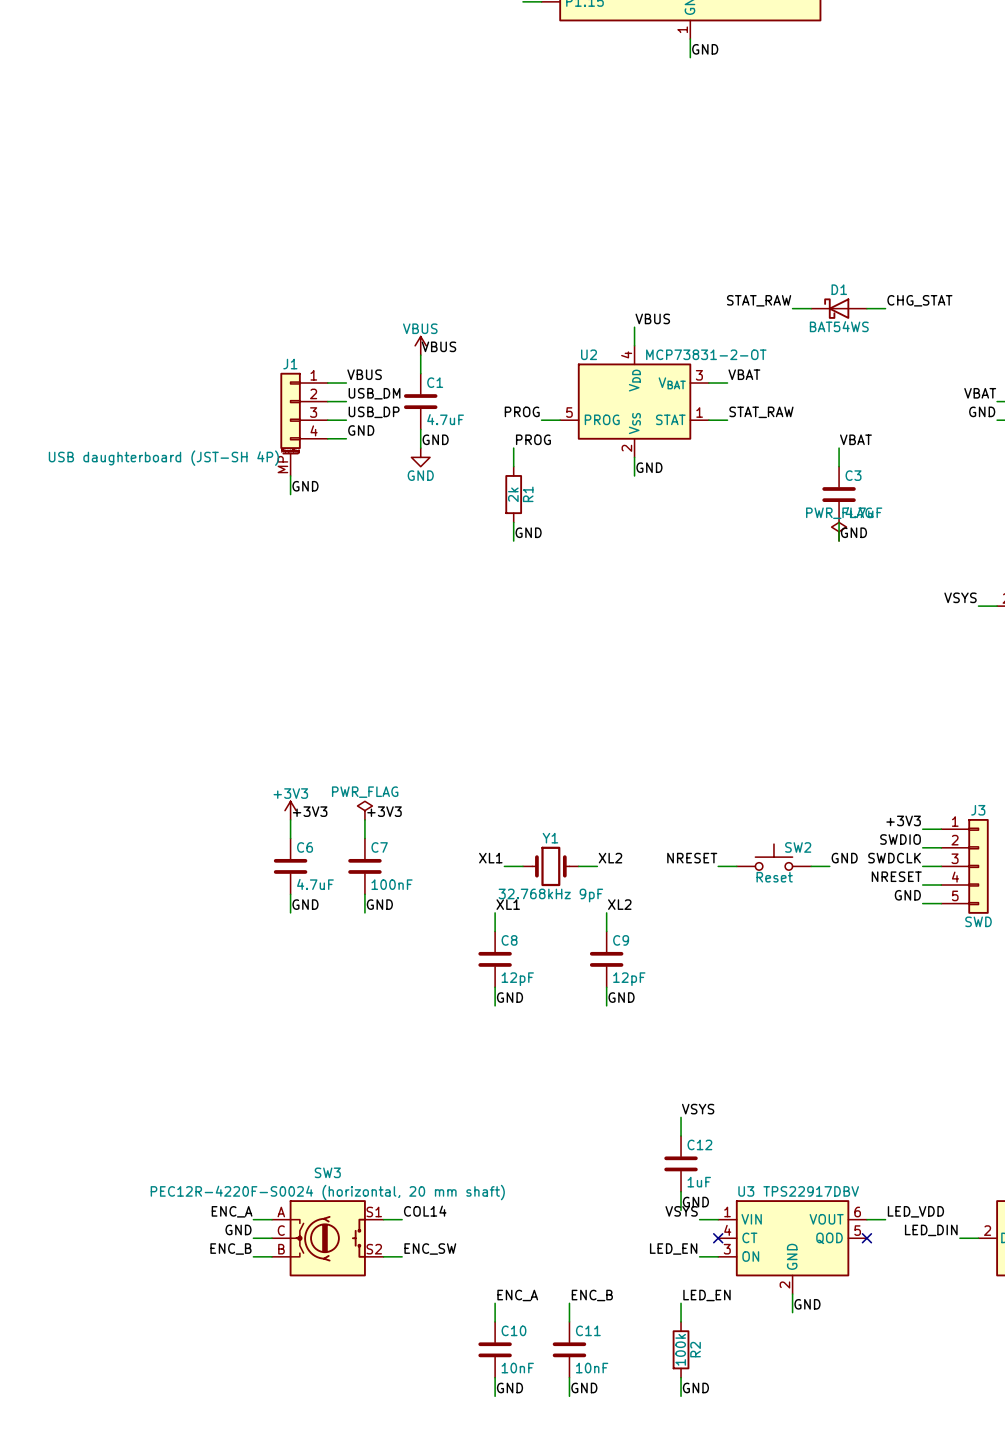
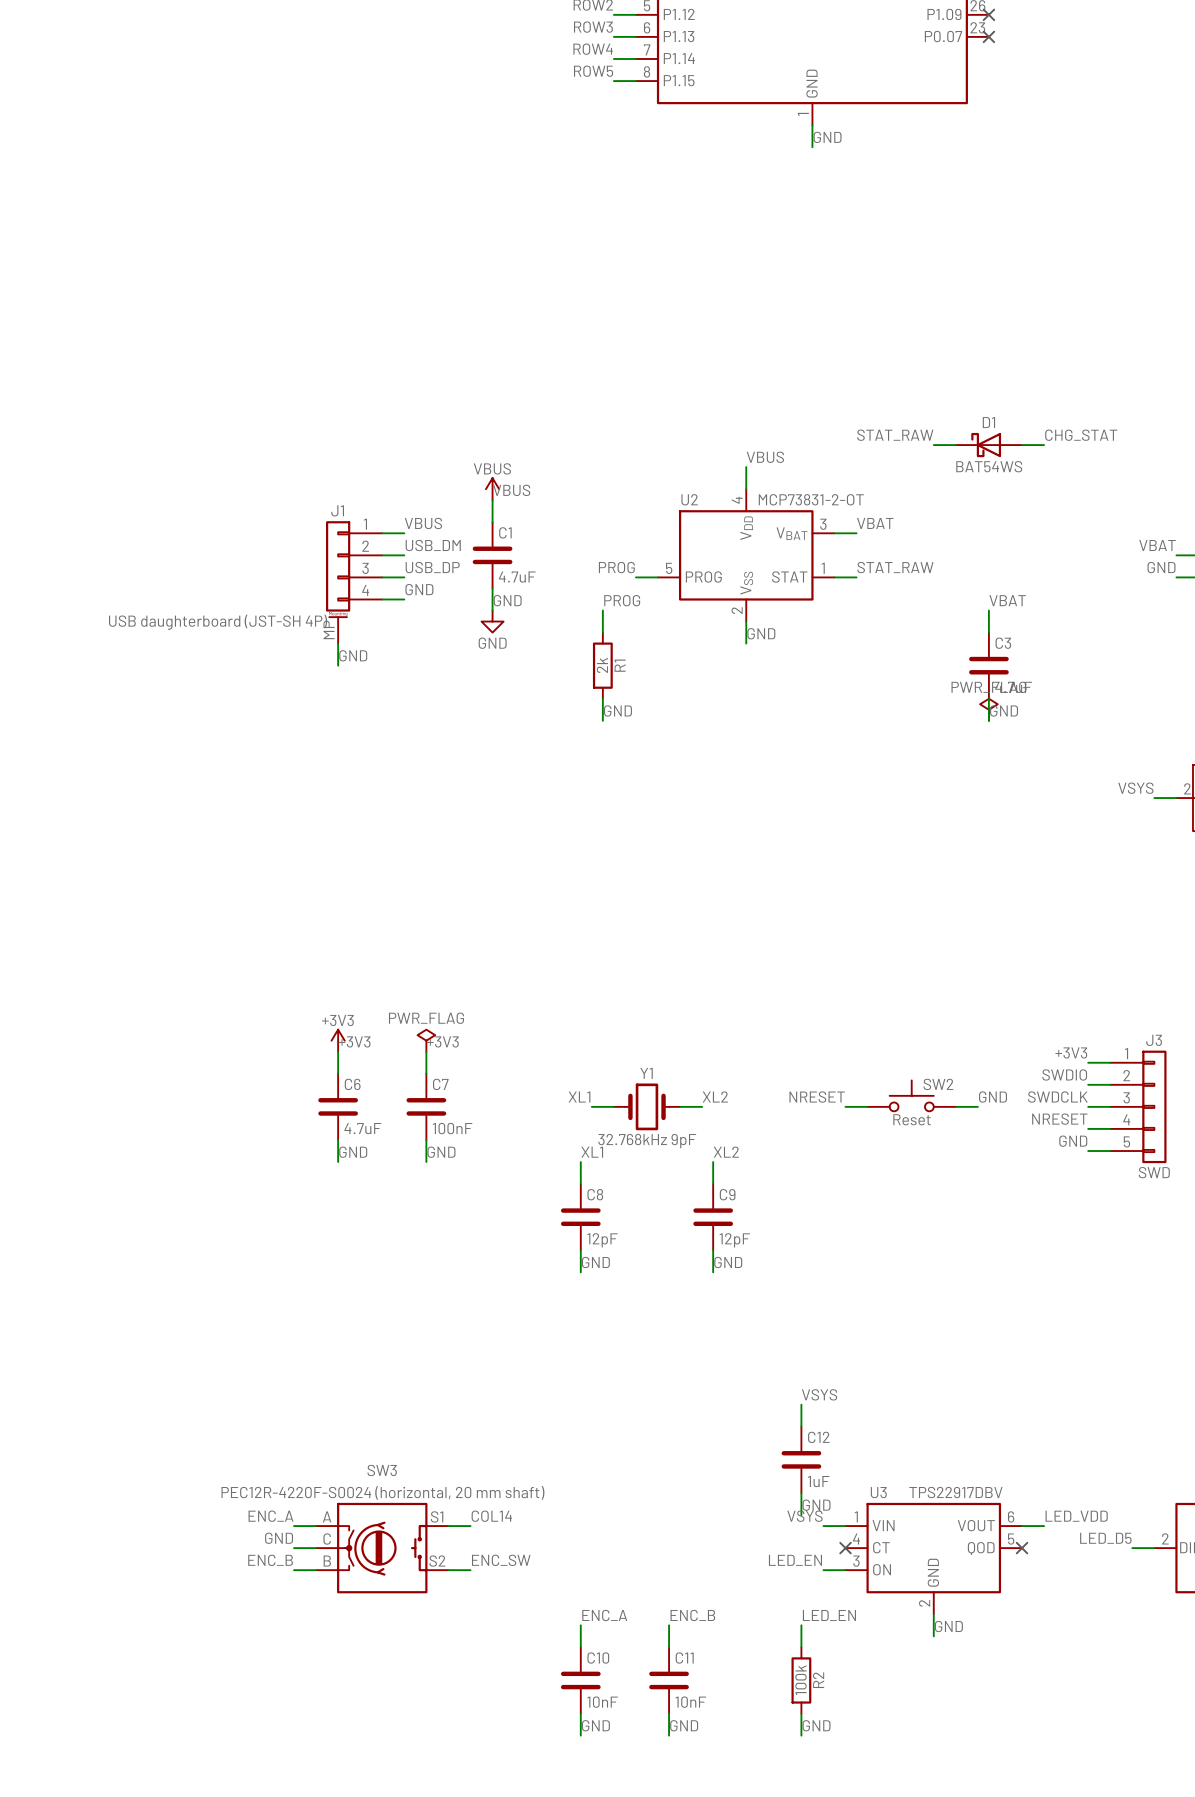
label: LED_DIN (931, 1230) -> LED_D5 (1105, 1538)

